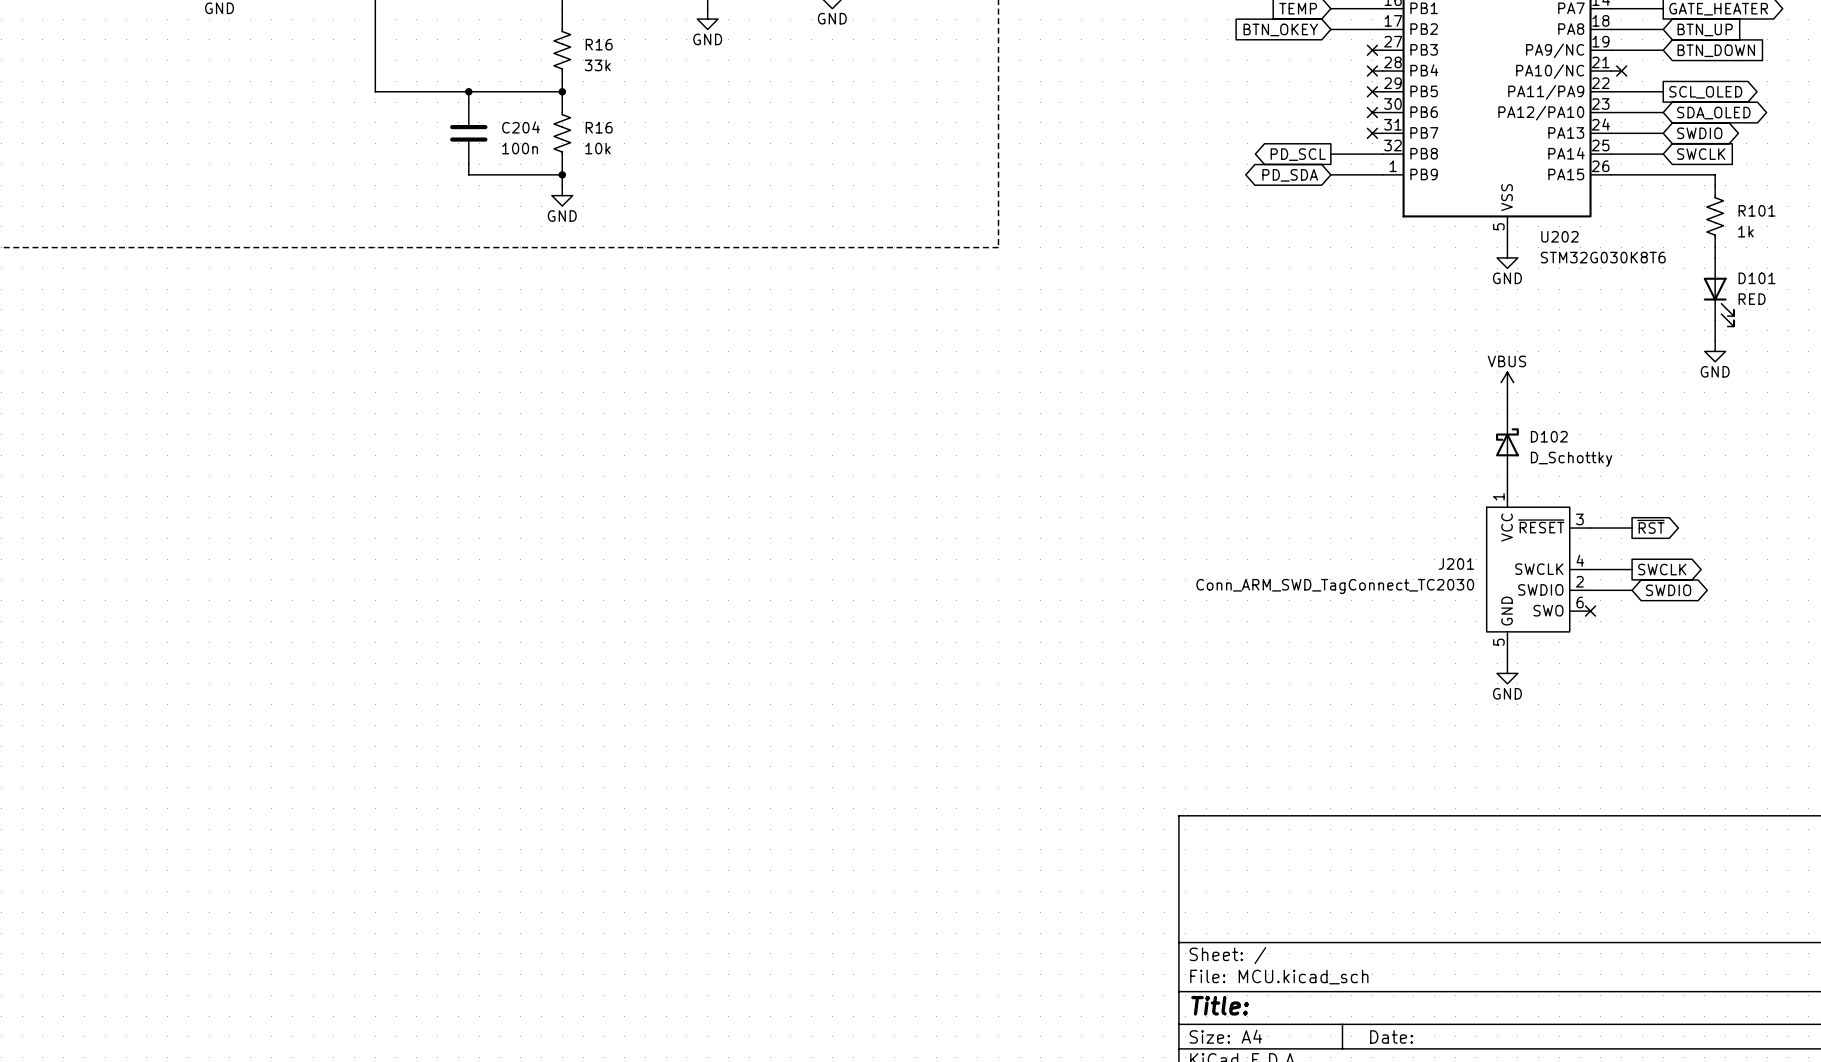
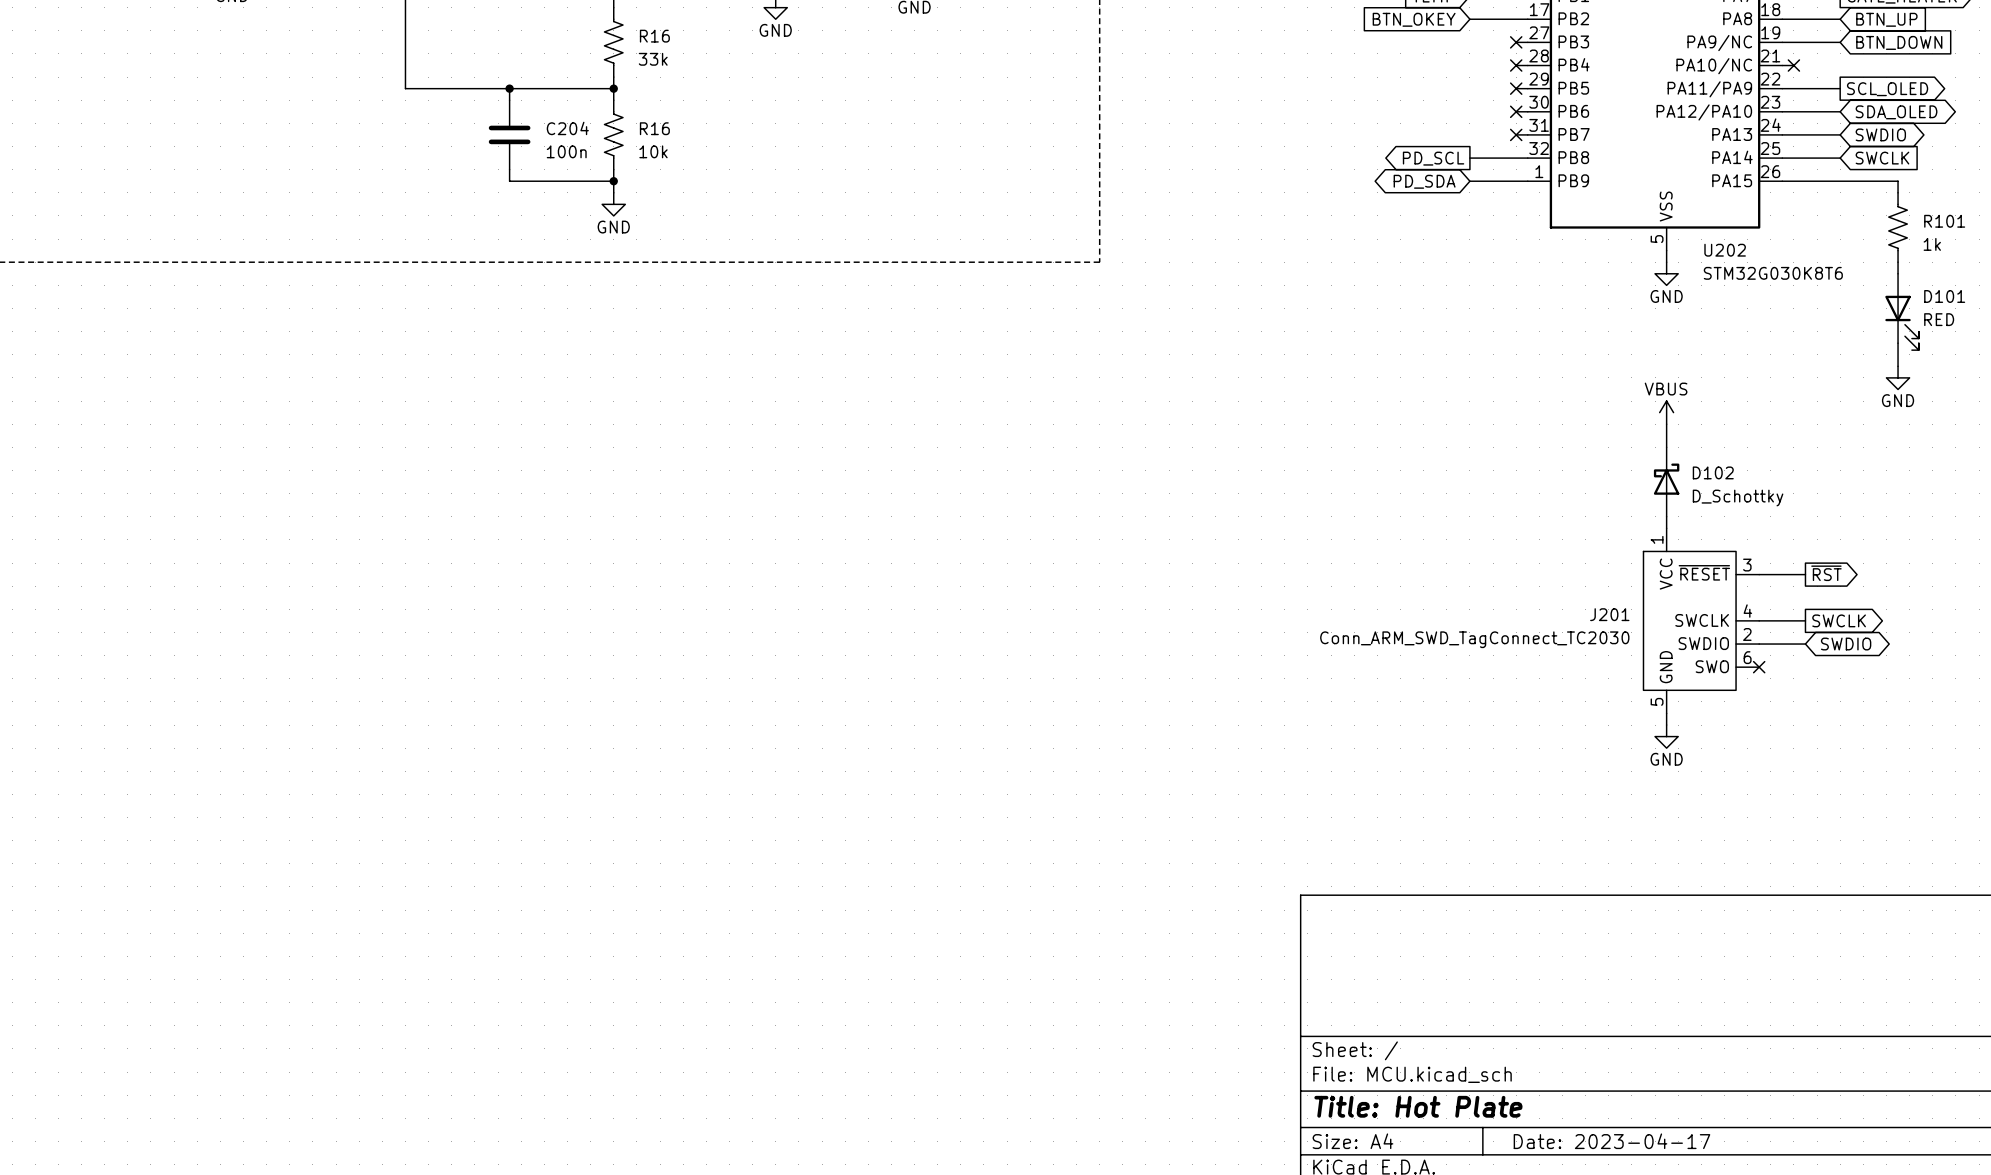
title block: Title: (1220, 1005) -> Title: Hot Plate (1418, 1106)
title block: Date: (1391, 1036) -> Date: 2023-04-17 (1611, 1141)

